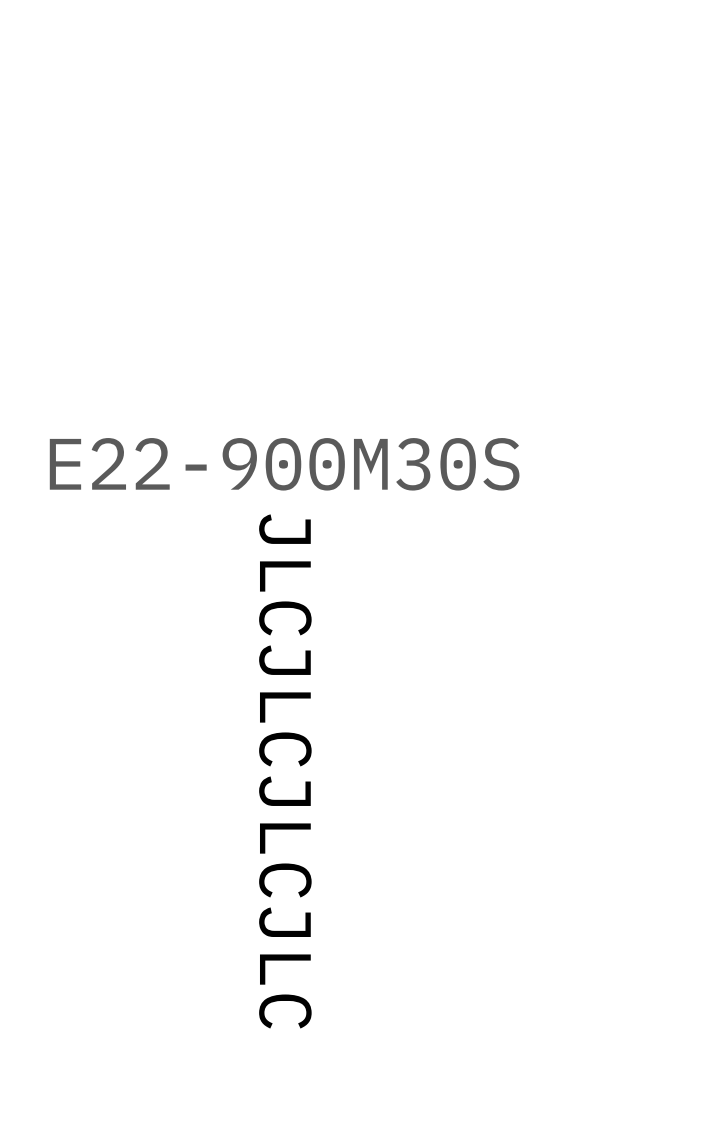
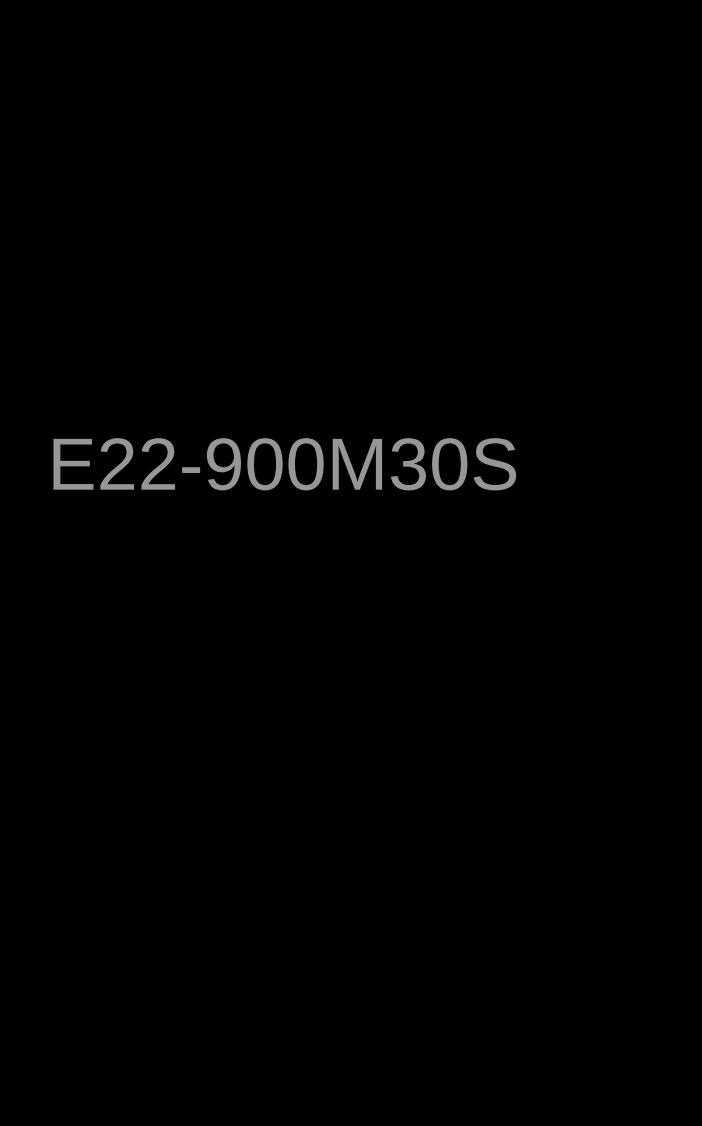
text: JLCJLCJLCJLC (285, 771) -> none

